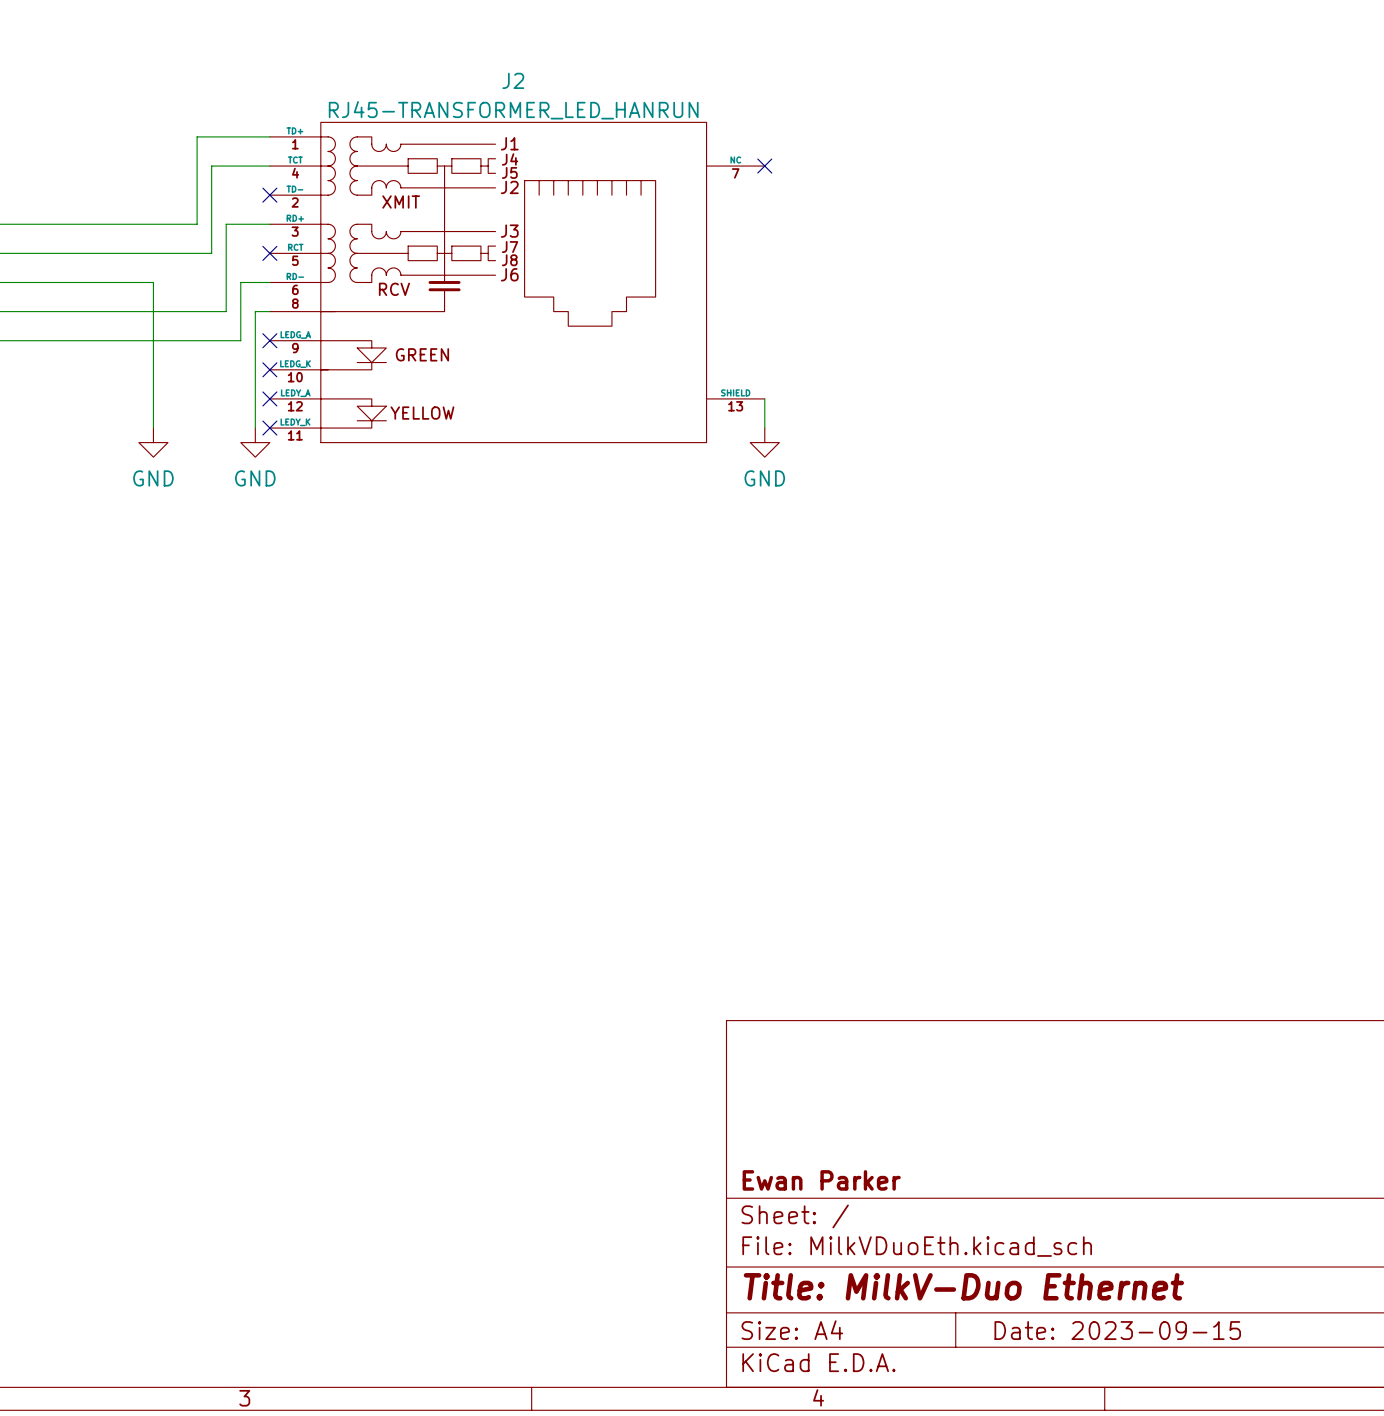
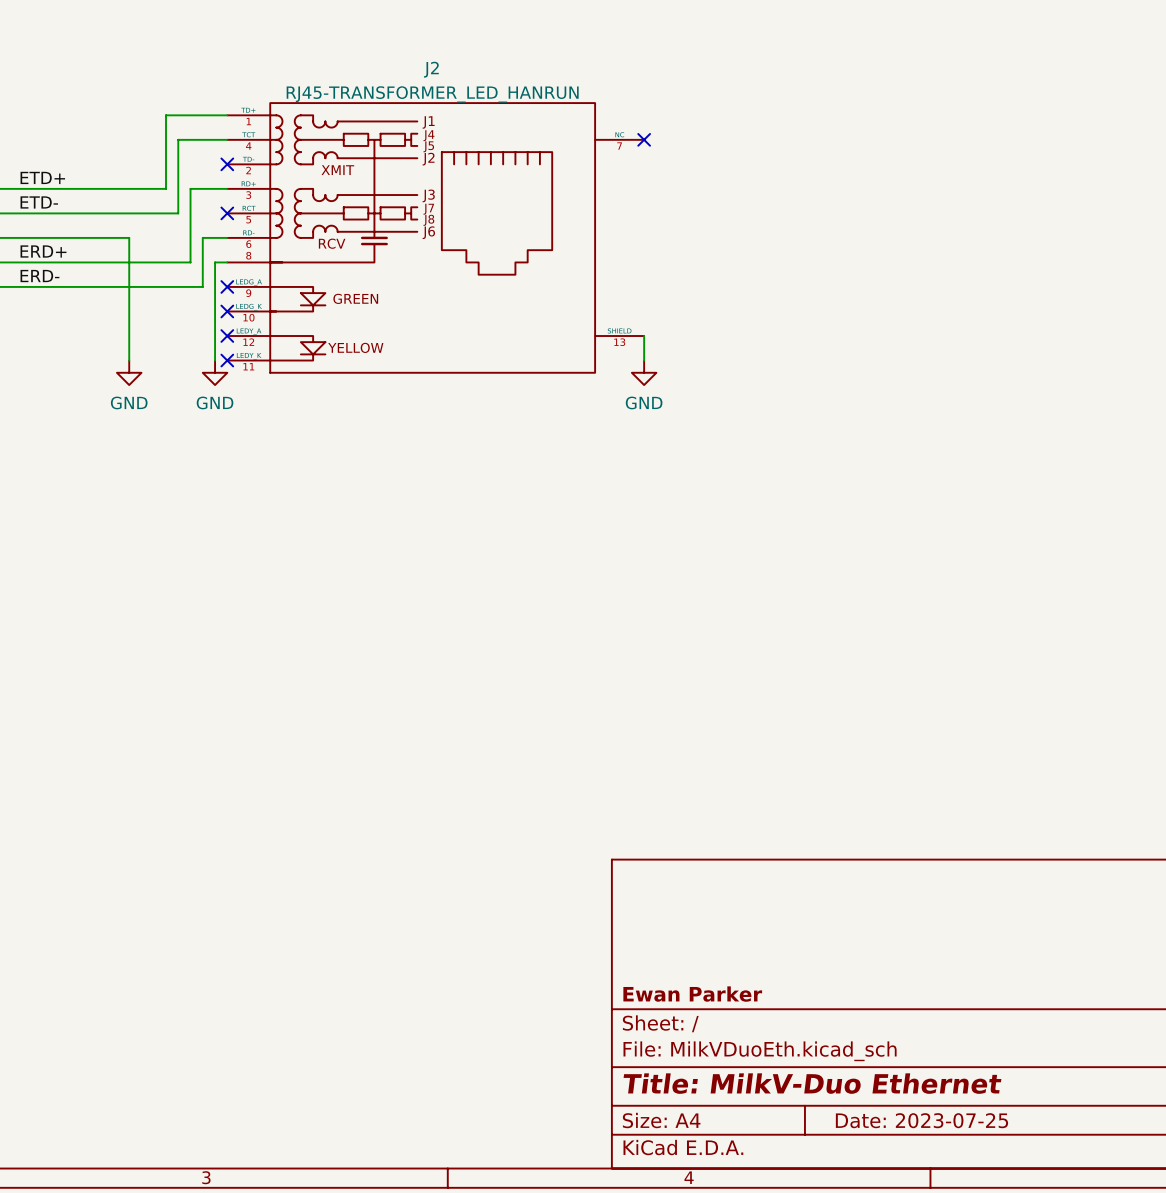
label: none -> ETD+ (42, 177)
label: none -> ETD- (39, 202)
label: none -> ERD+ (43, 251)
label: none -> ERD- (39, 276)
title block: Date: 2023-09-15 (1117, 1330) -> Date: 2023-07-25 (921, 1120)

